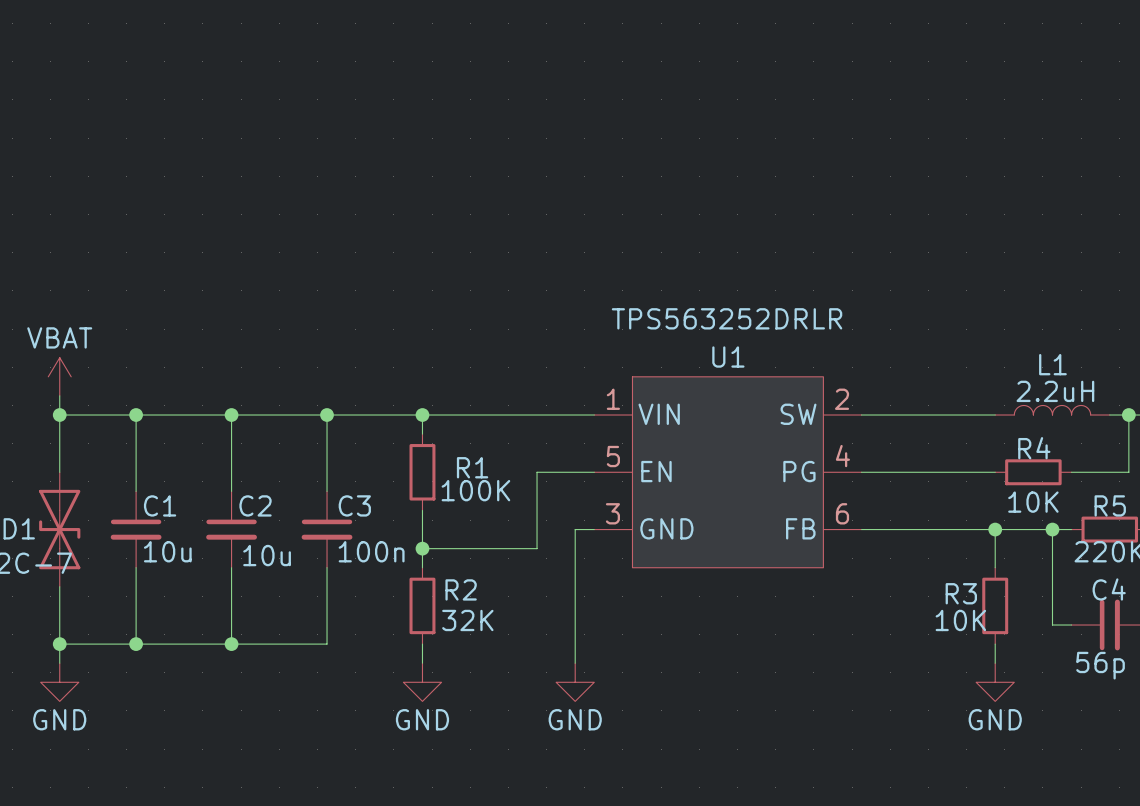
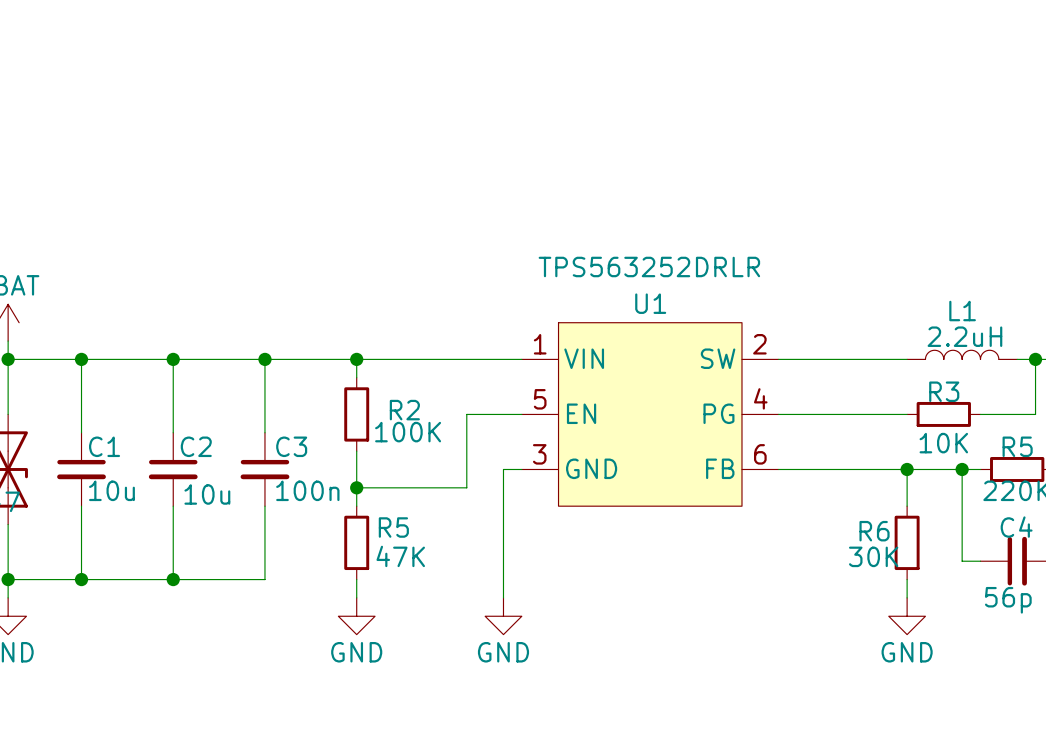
R4 name: R4 (1034, 448) -> R3 (944, 391)
R1 name: R1 (472, 467) -> R2 (404, 410)
R2 name: R2 (461, 589) -> R5 (393, 527)
R3 name: R3 (961, 593) -> R6 (874, 531)
R2 value: 32K (467, 620) -> 47K (400, 556)
R3 value: 10K (960, 620) -> 30K (873, 556)

